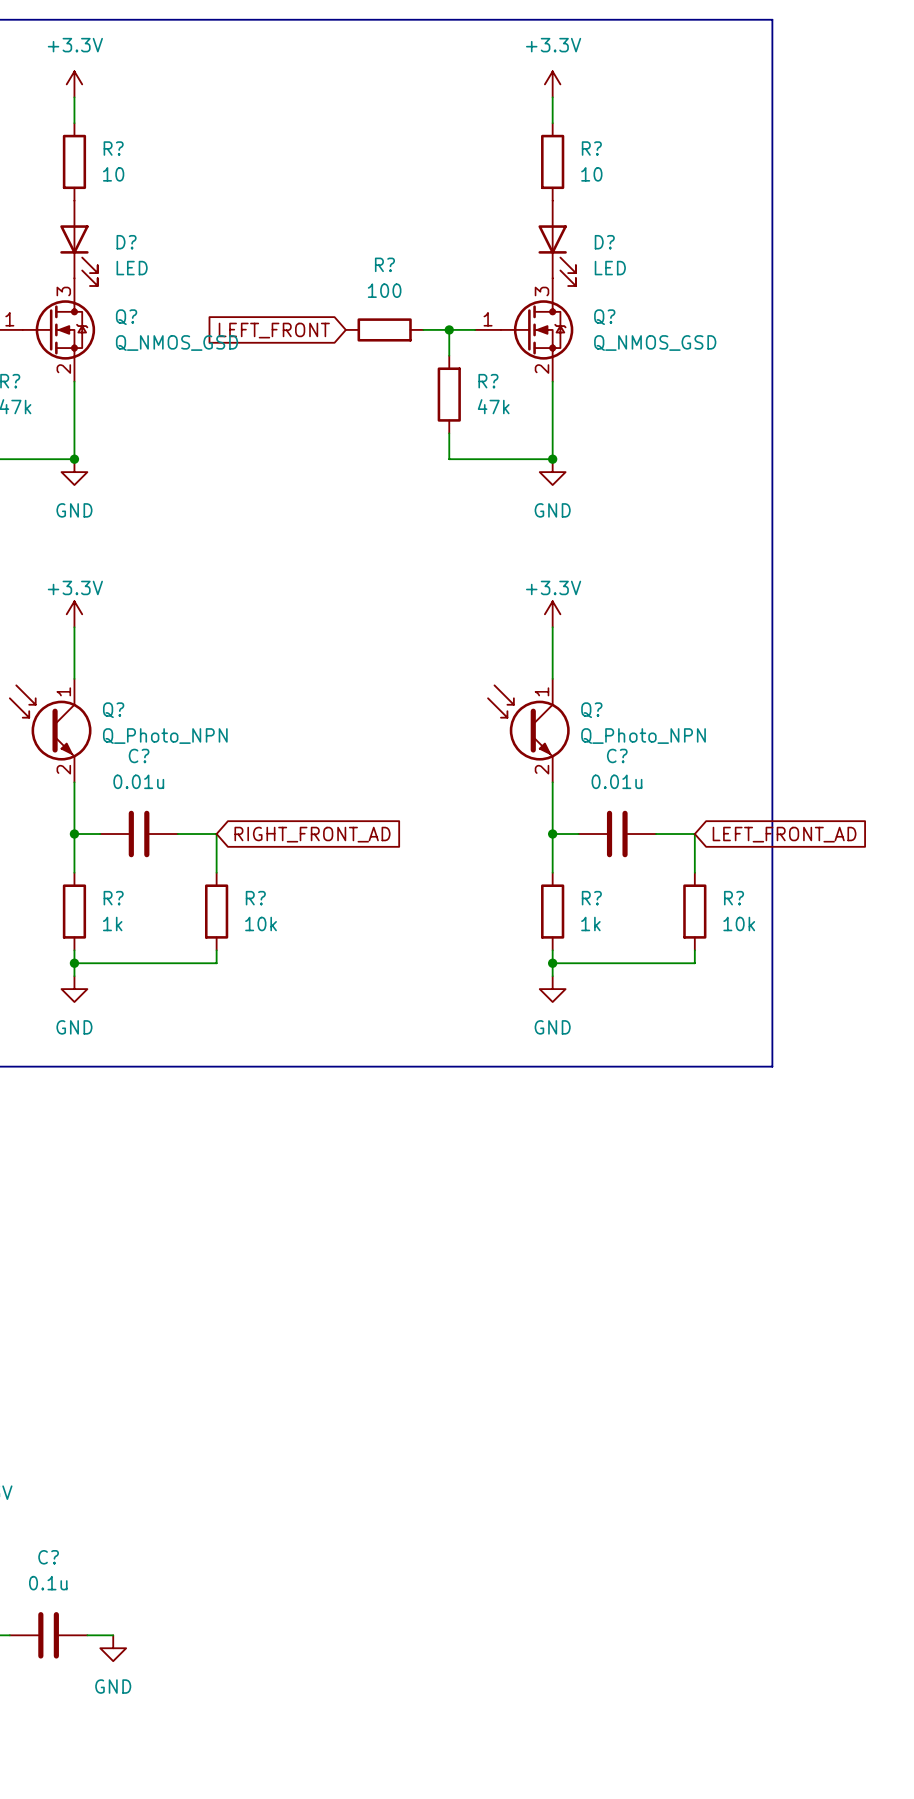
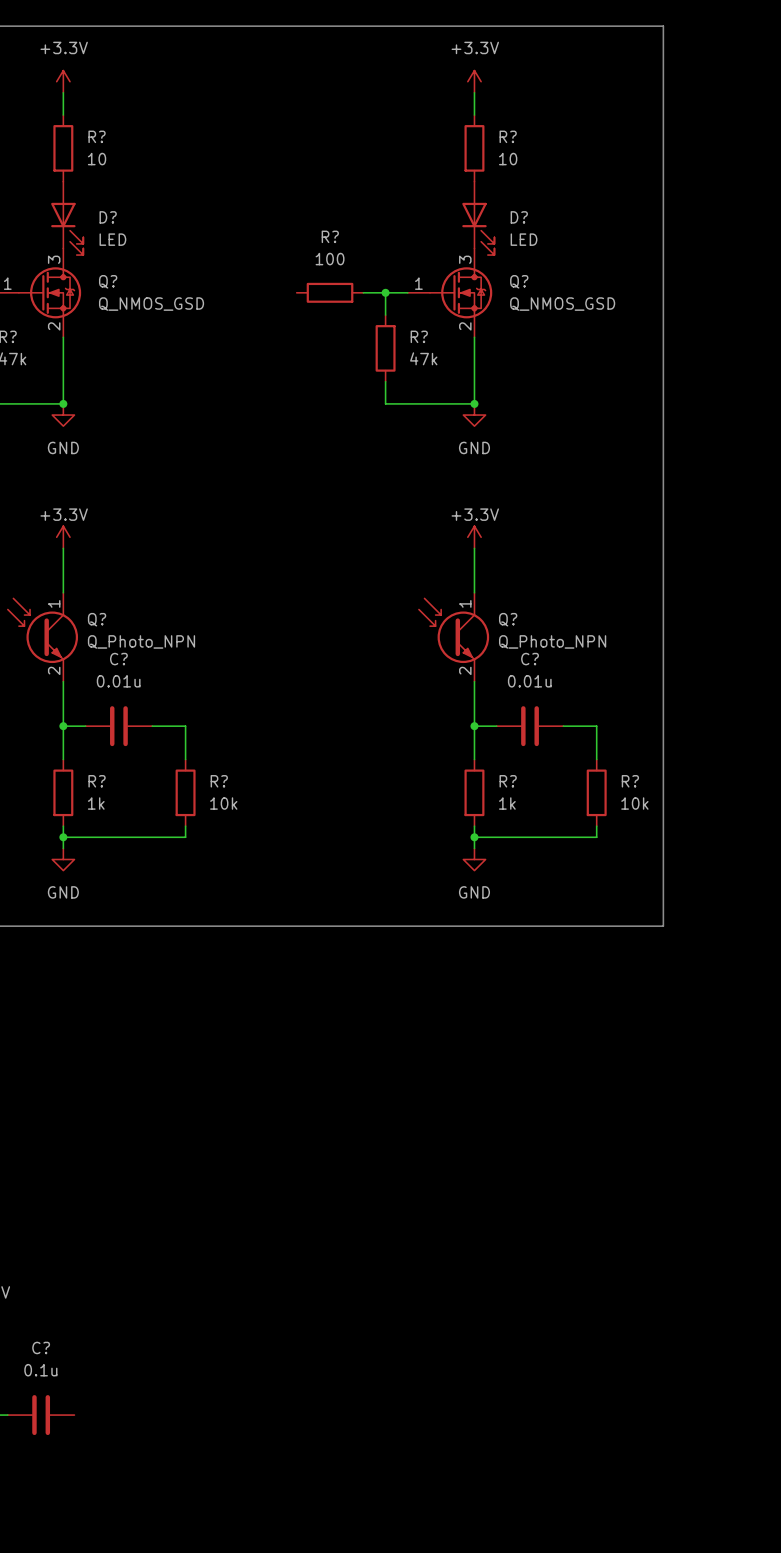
global label: LEFT_FRONT (274, 330) -> none
global label: RIGHT_FRONT_AD (312, 834) -> none
global label: LEFT_FRONT_AD (784, 834) -> none
wire: (87, 1635) (113, 1635) -> none
power symbol: GND (113, 1648) -> none

